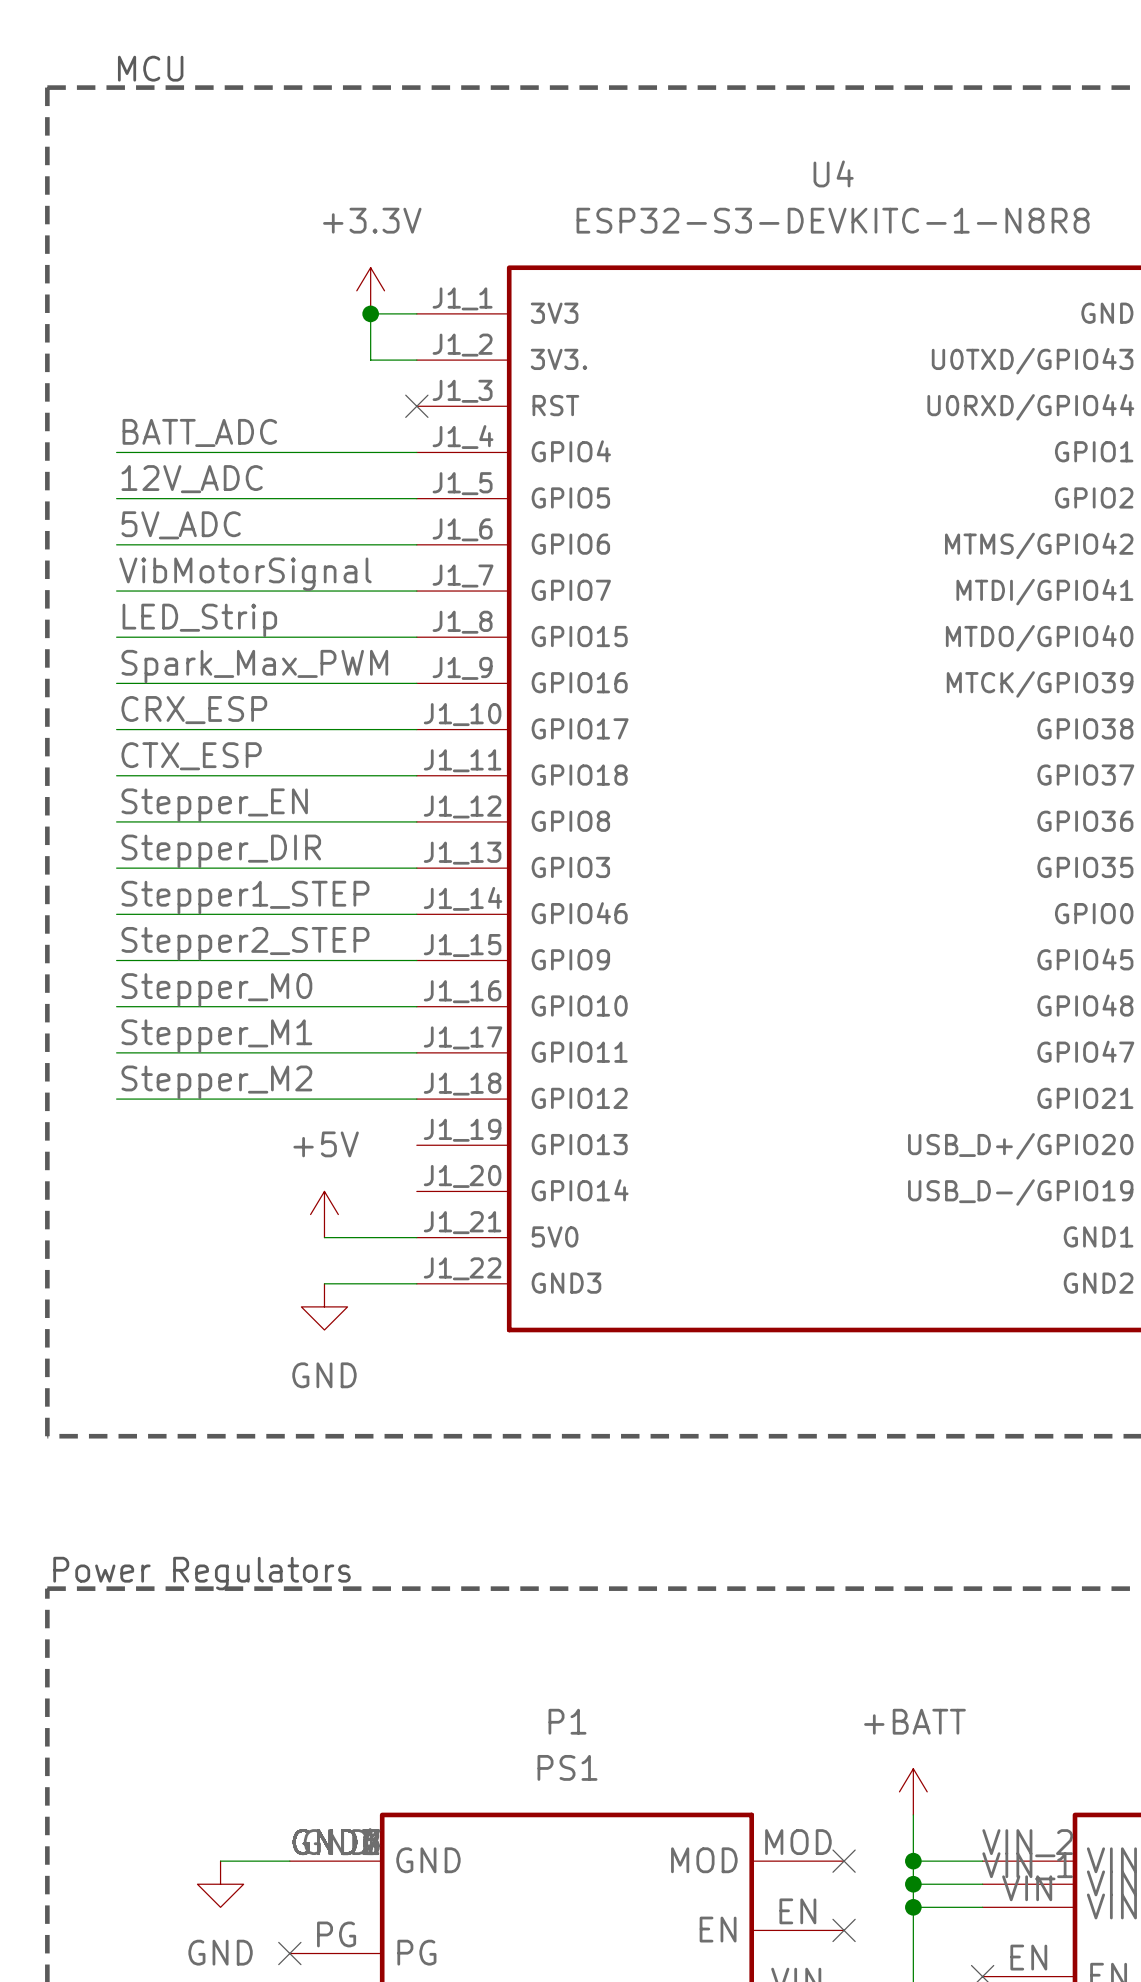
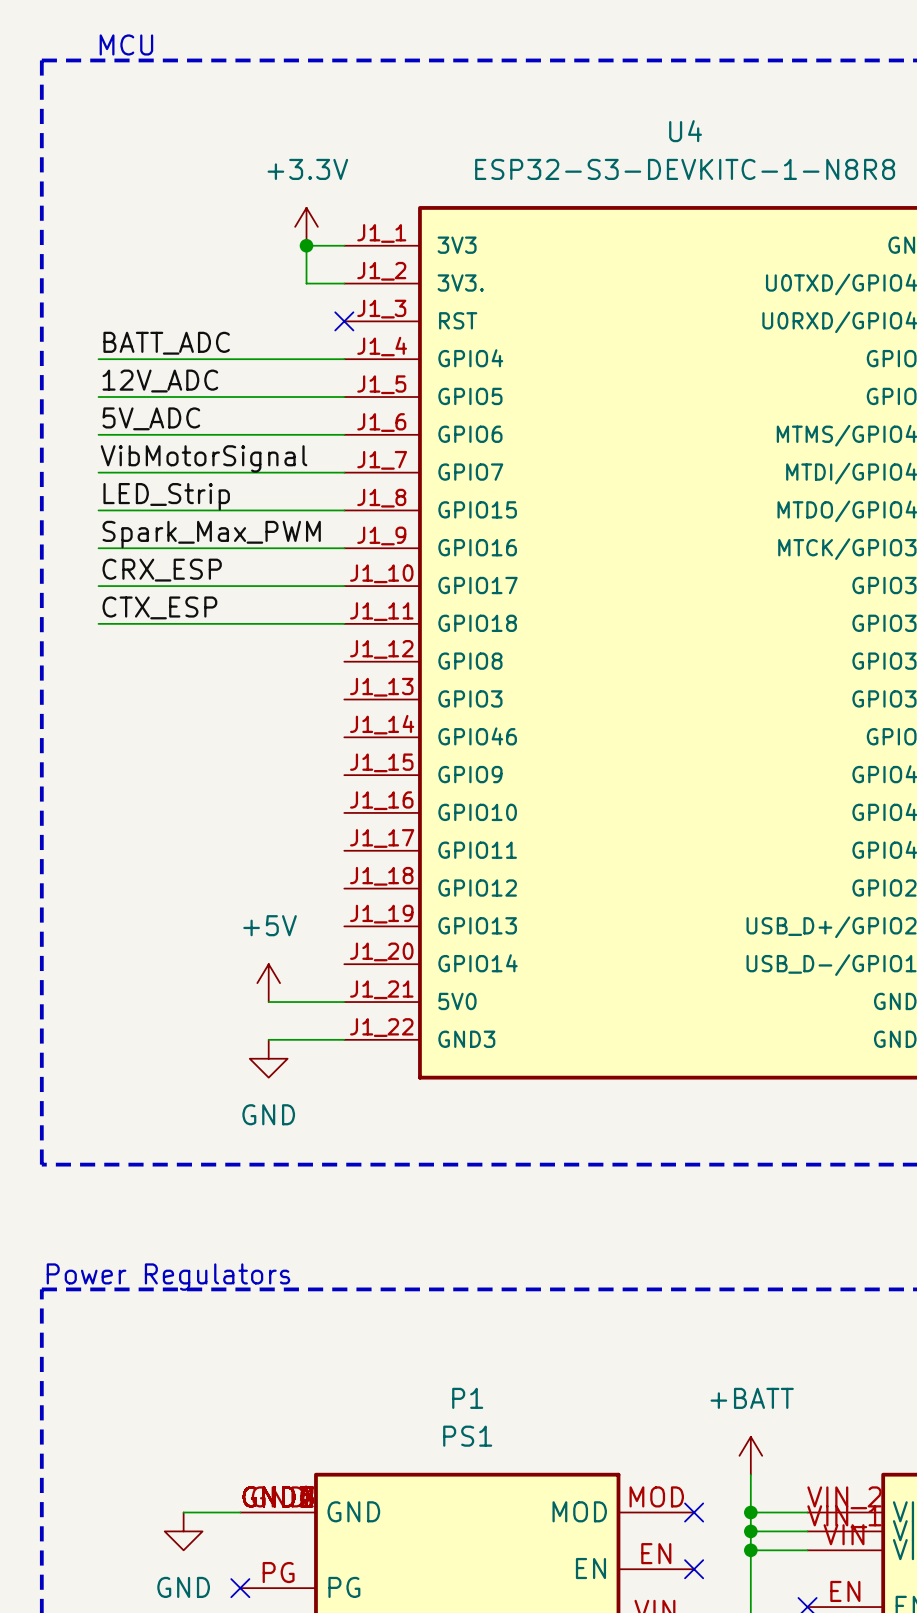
label: Stepper_EN (214, 805) -> none
wire: (116, 821) (416, 821) -> none
label: Stepper_DIR (221, 851) -> none
wire: (116, 868) (416, 868) -> none
label: Stepper1_STEP (245, 897) -> none
wire: (116, 914) (416, 914) -> none
label: Stepper2_STEP (245, 943) -> none
wire: (116, 960) (416, 960) -> none
label: Stepper_M0 (216, 989) -> none
wire: (116, 1006) (416, 1006) -> none
label: Stepper_M1 (216, 1036) -> none
wire: (116, 1052) (416, 1052) -> none
label: Stepper_M2 (216, 1082) -> none
wire: (116, 1099) (416, 1099) -> none

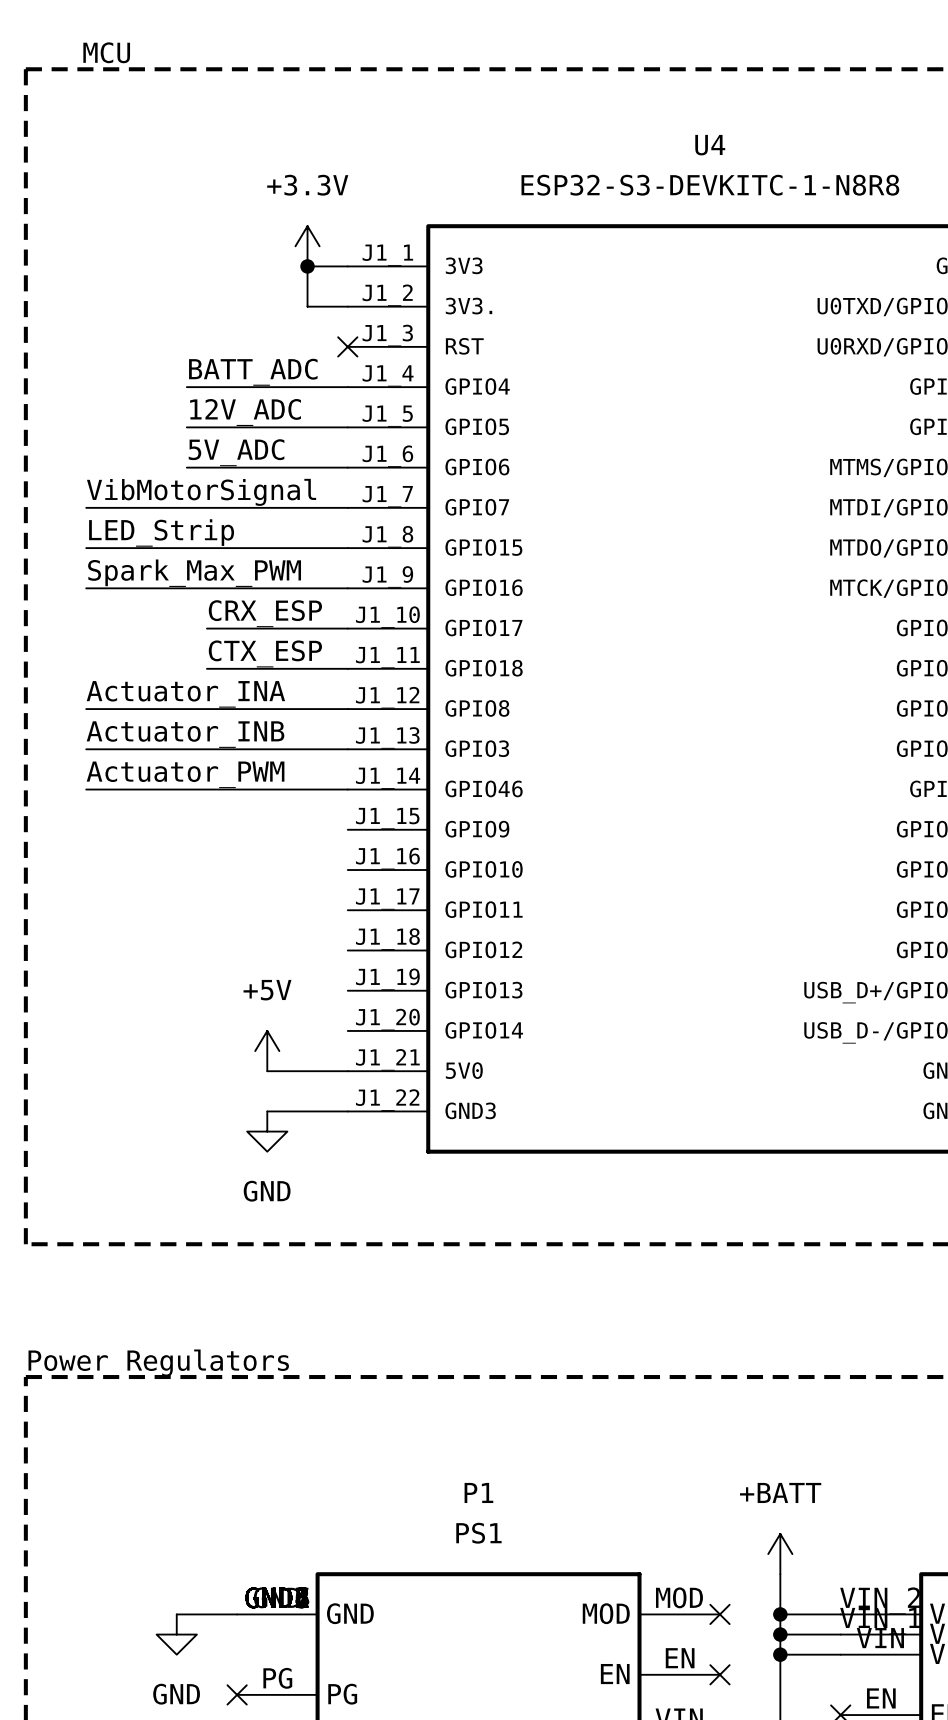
label position: BATT_ADC (166, 343) -> BATT_ADC (253, 372)
wire: (98, 359) (193, 359) -> none
label position: 12V_ADC (160, 381) -> 12V_ADC (245, 412)
wire: (98, 397) (193, 397) -> none
label position: 5V_ADC (151, 418) -> 5V_ADC (236, 452)
wire: (98, 434) (193, 434) -> none
label position: CRX_ESP (162, 570) -> CRX_ESP (265, 613)
wire: (98, 586) (211, 586) -> none
label position: CTX_ESP (159, 607) -> CTX_ESP (265, 653)
wire: (98, 623) (211, 623) -> none
label: none -> Actuator_INA (185, 694)
wire: none -> (86, 709) (347, 709)
label: none -> Actuator_INB (185, 734)
wire: none -> (86, 749) (347, 749)
label: none -> Actuator_PWM (185, 774)
wire: none -> (86, 789) (347, 789)

